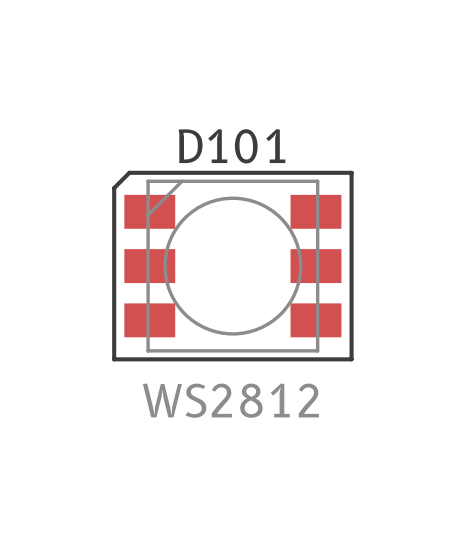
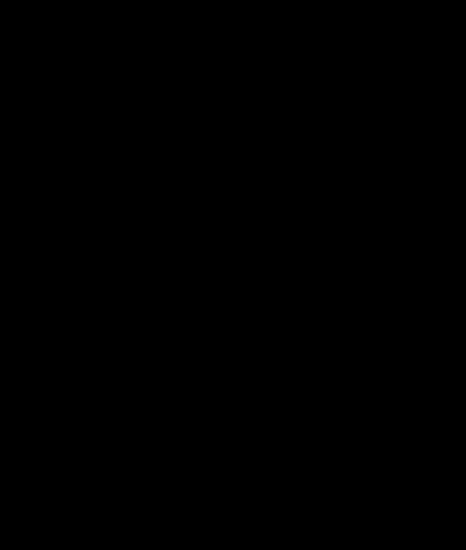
D101: WS2812 (232, 266) -> none

